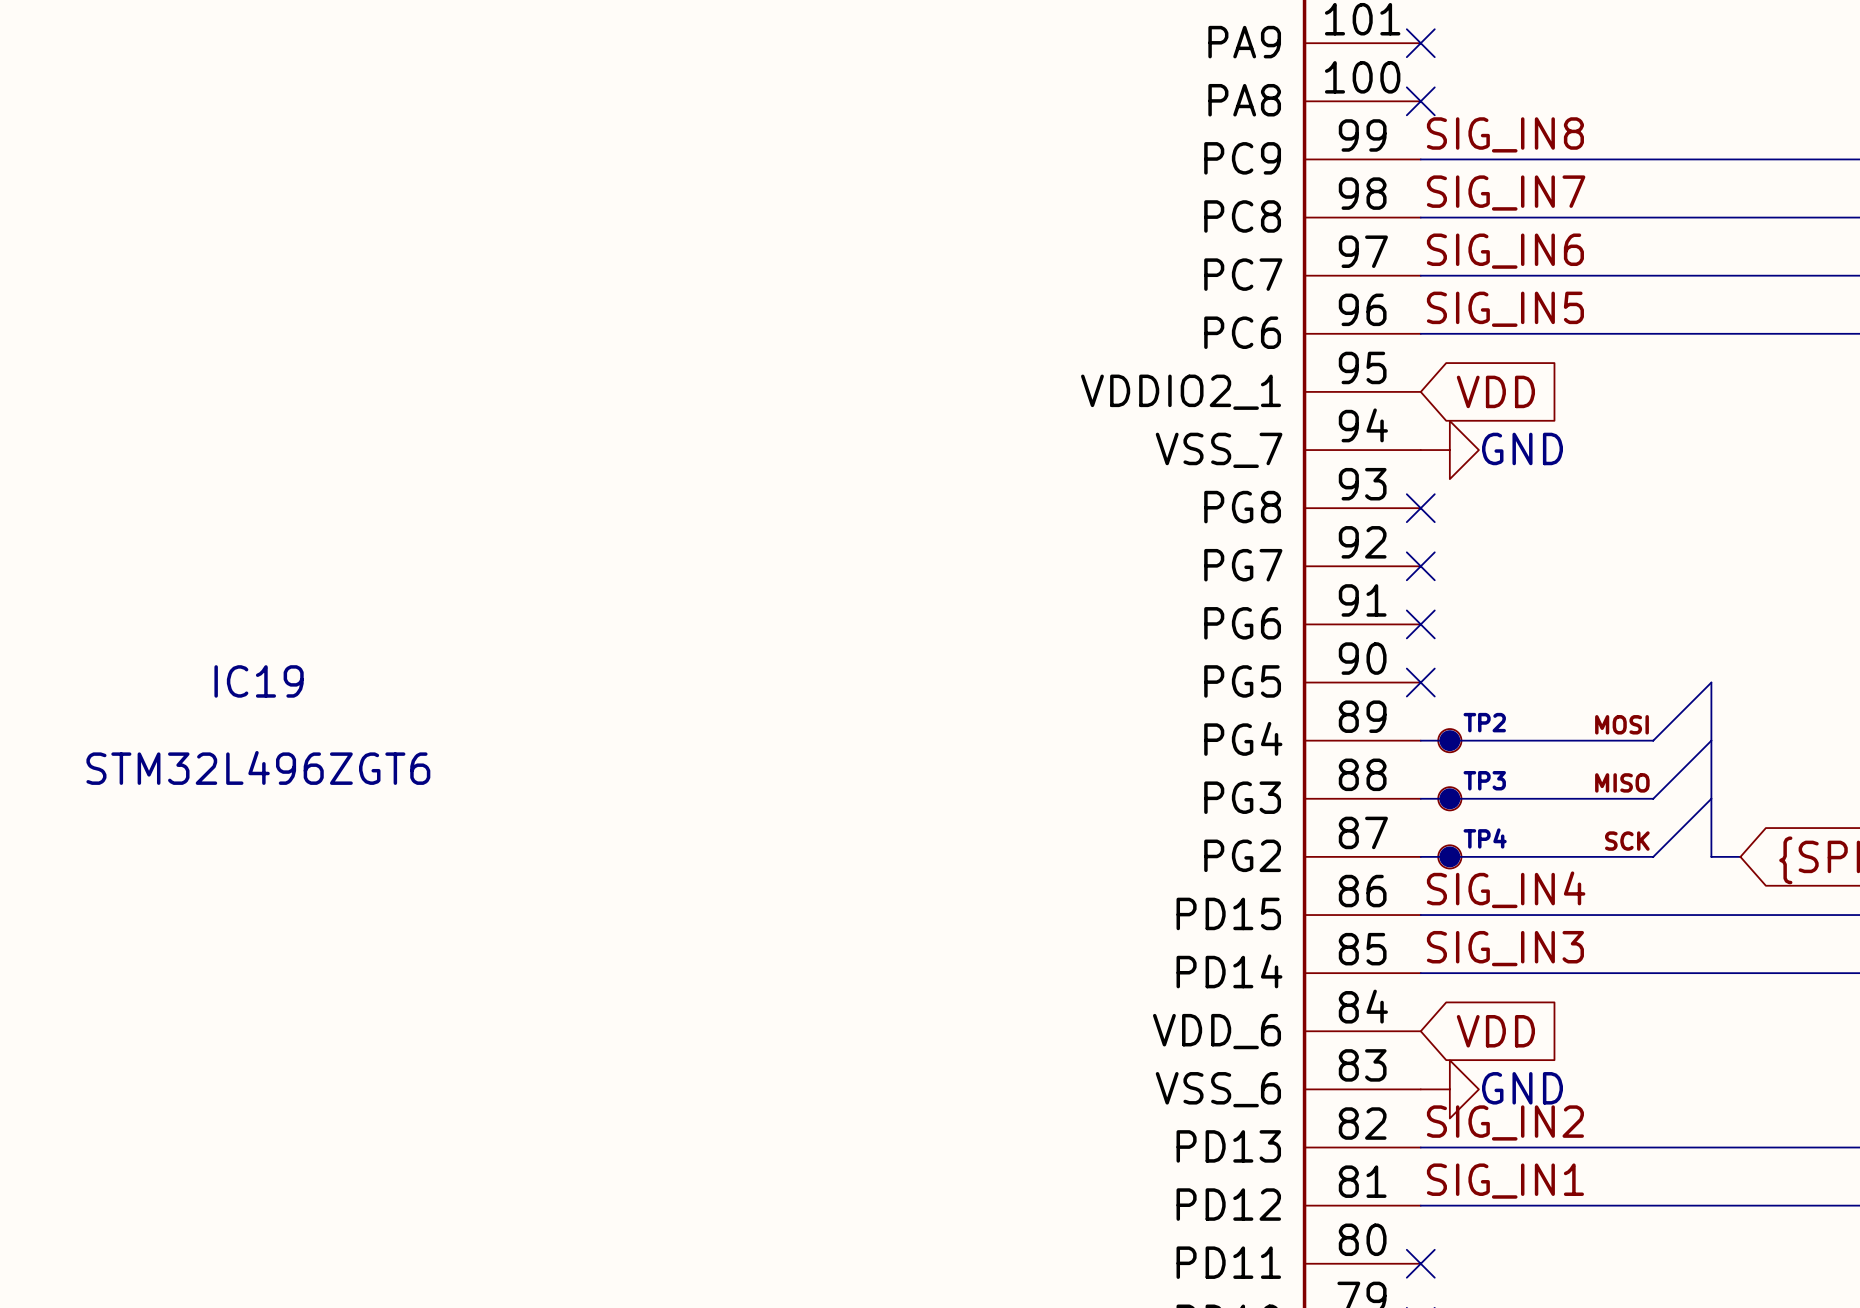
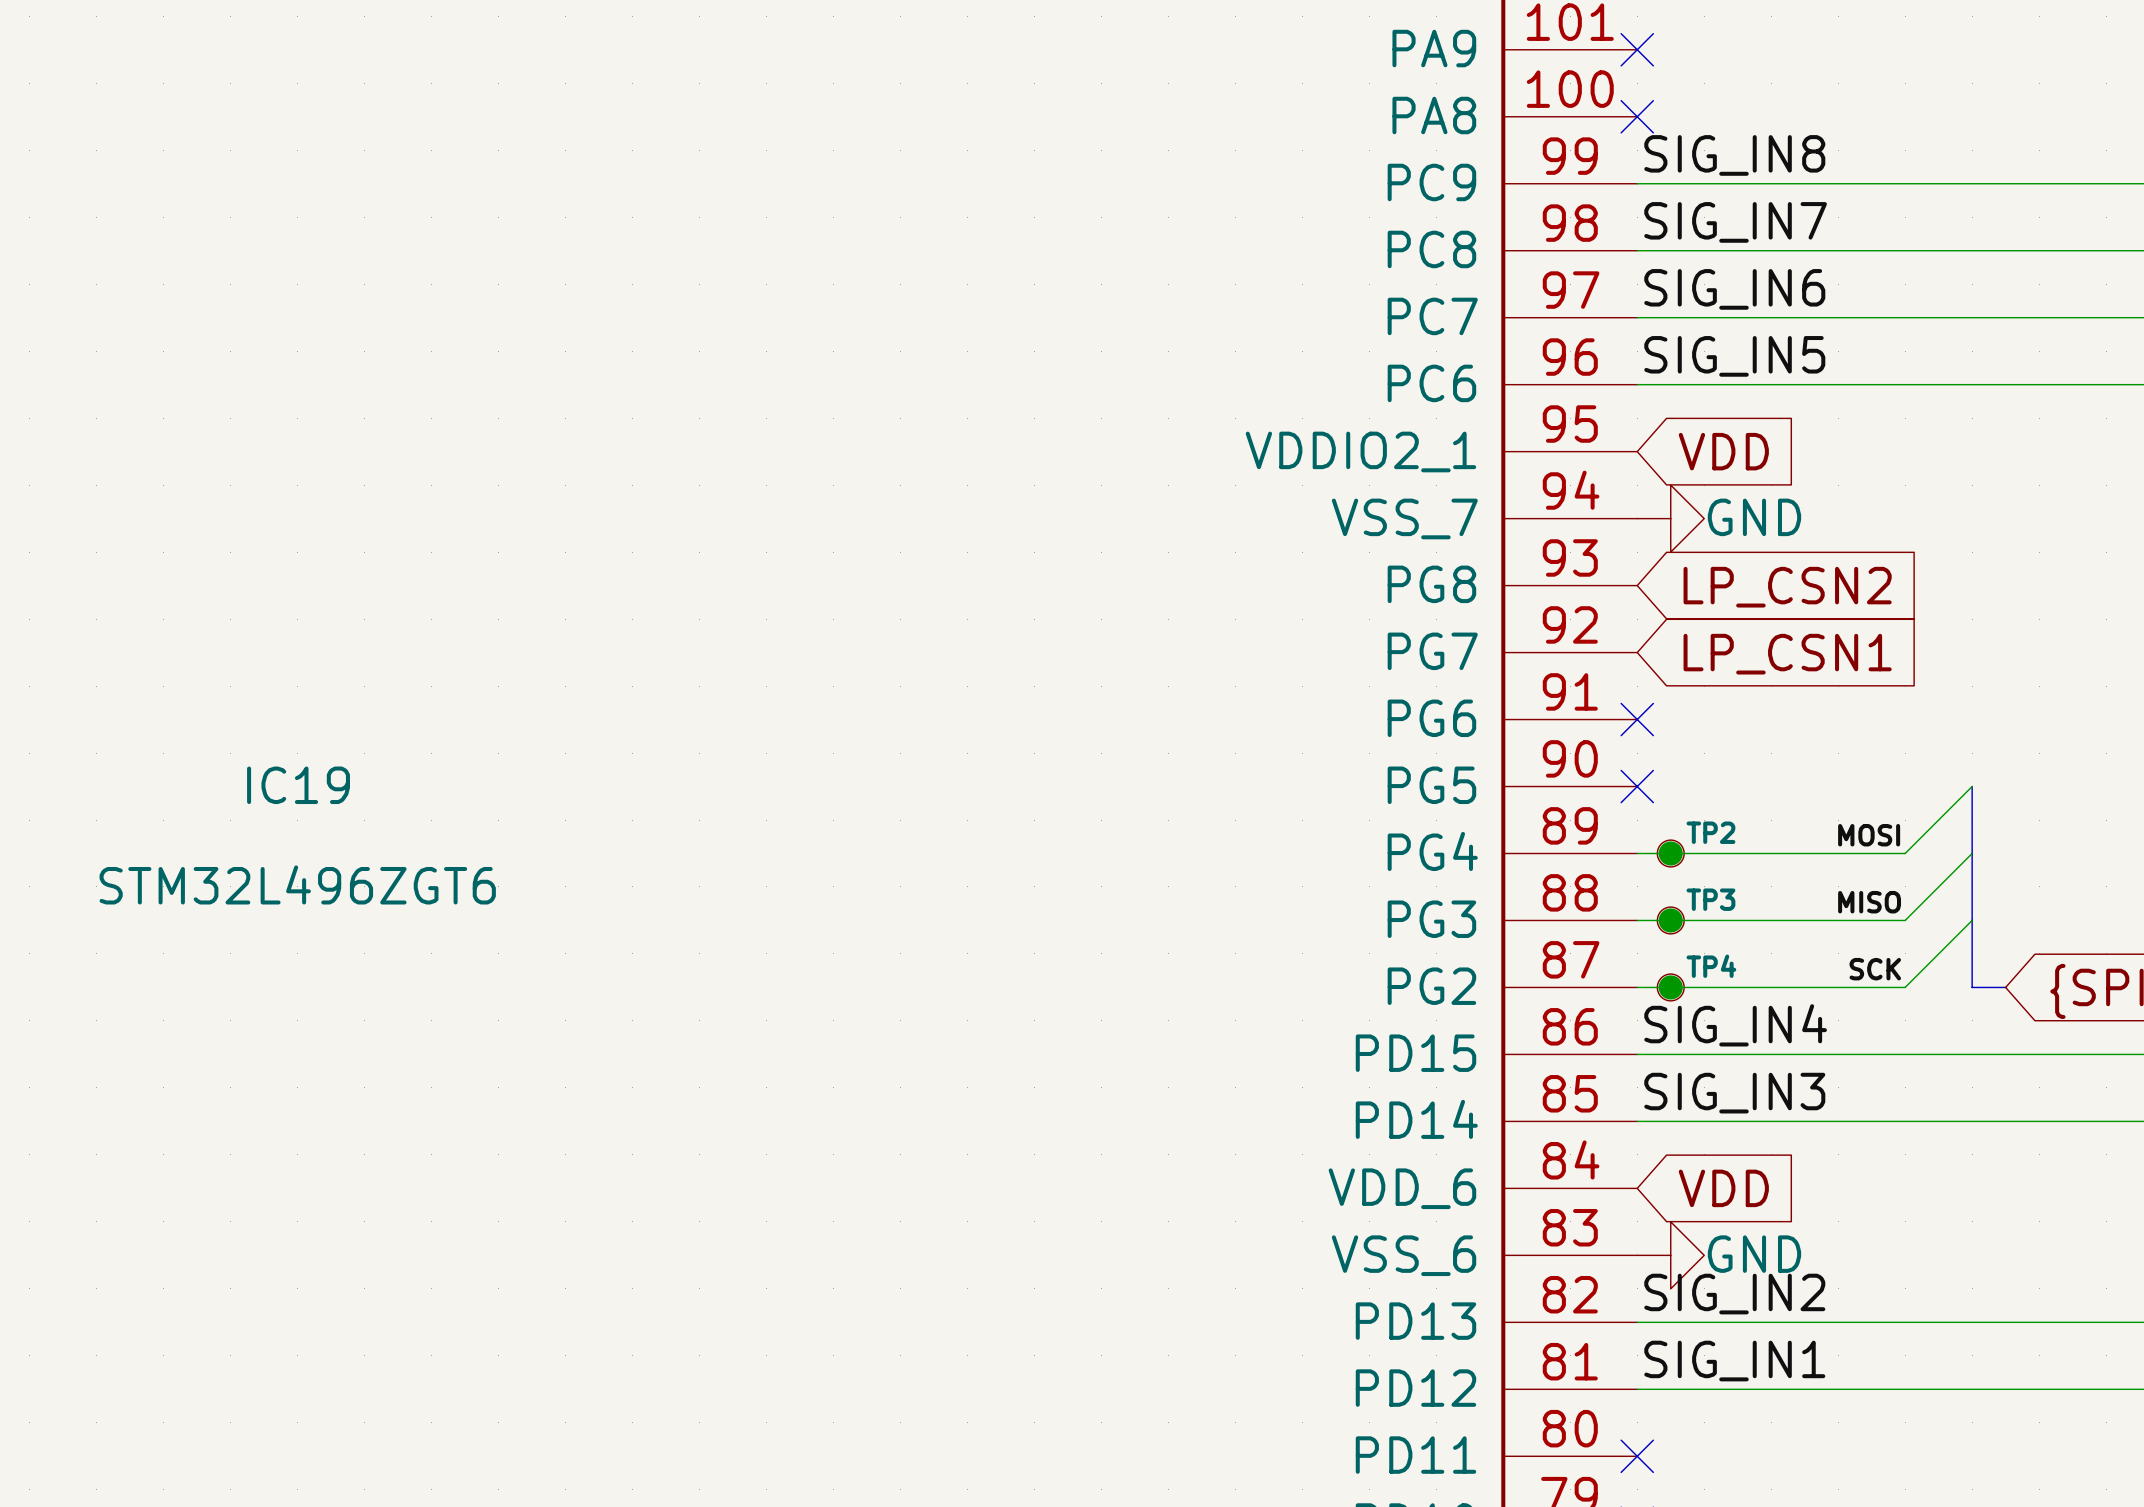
no-connect mark: (1420, 508) -> none
global label: none -> LP_CSN2 (1787, 587)
no-connect mark: (1420, 566) -> none
global label: none -> LP_CSN1 (1787, 654)

